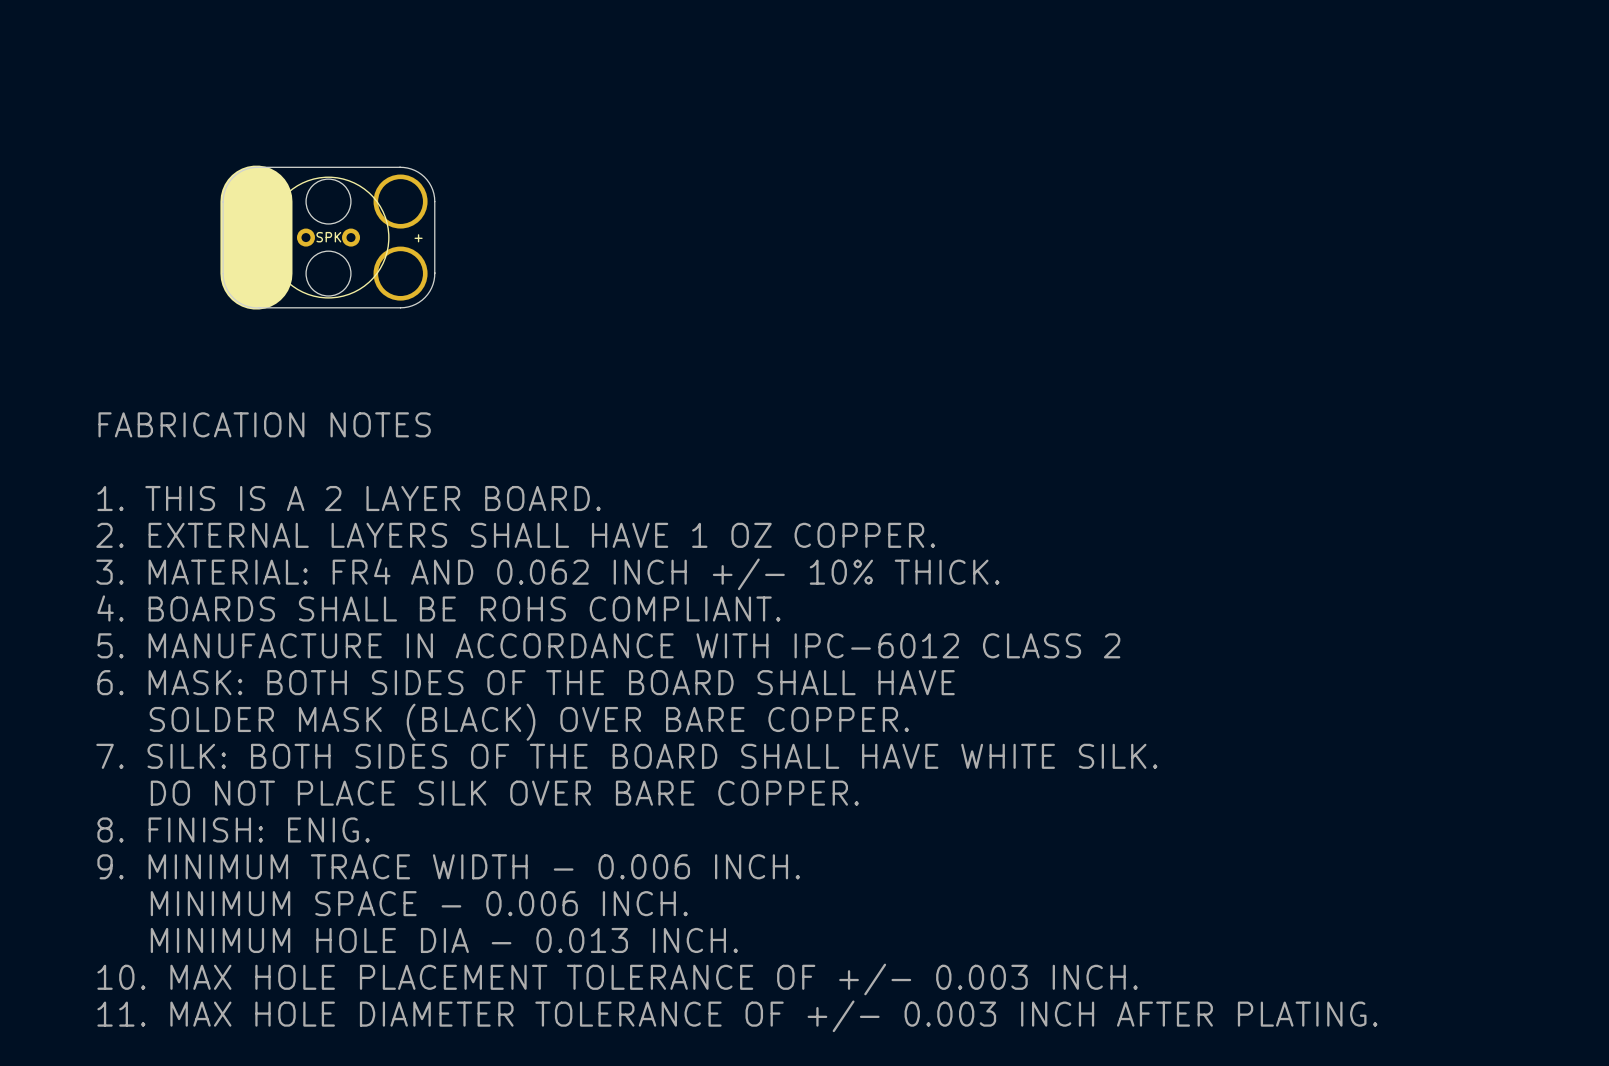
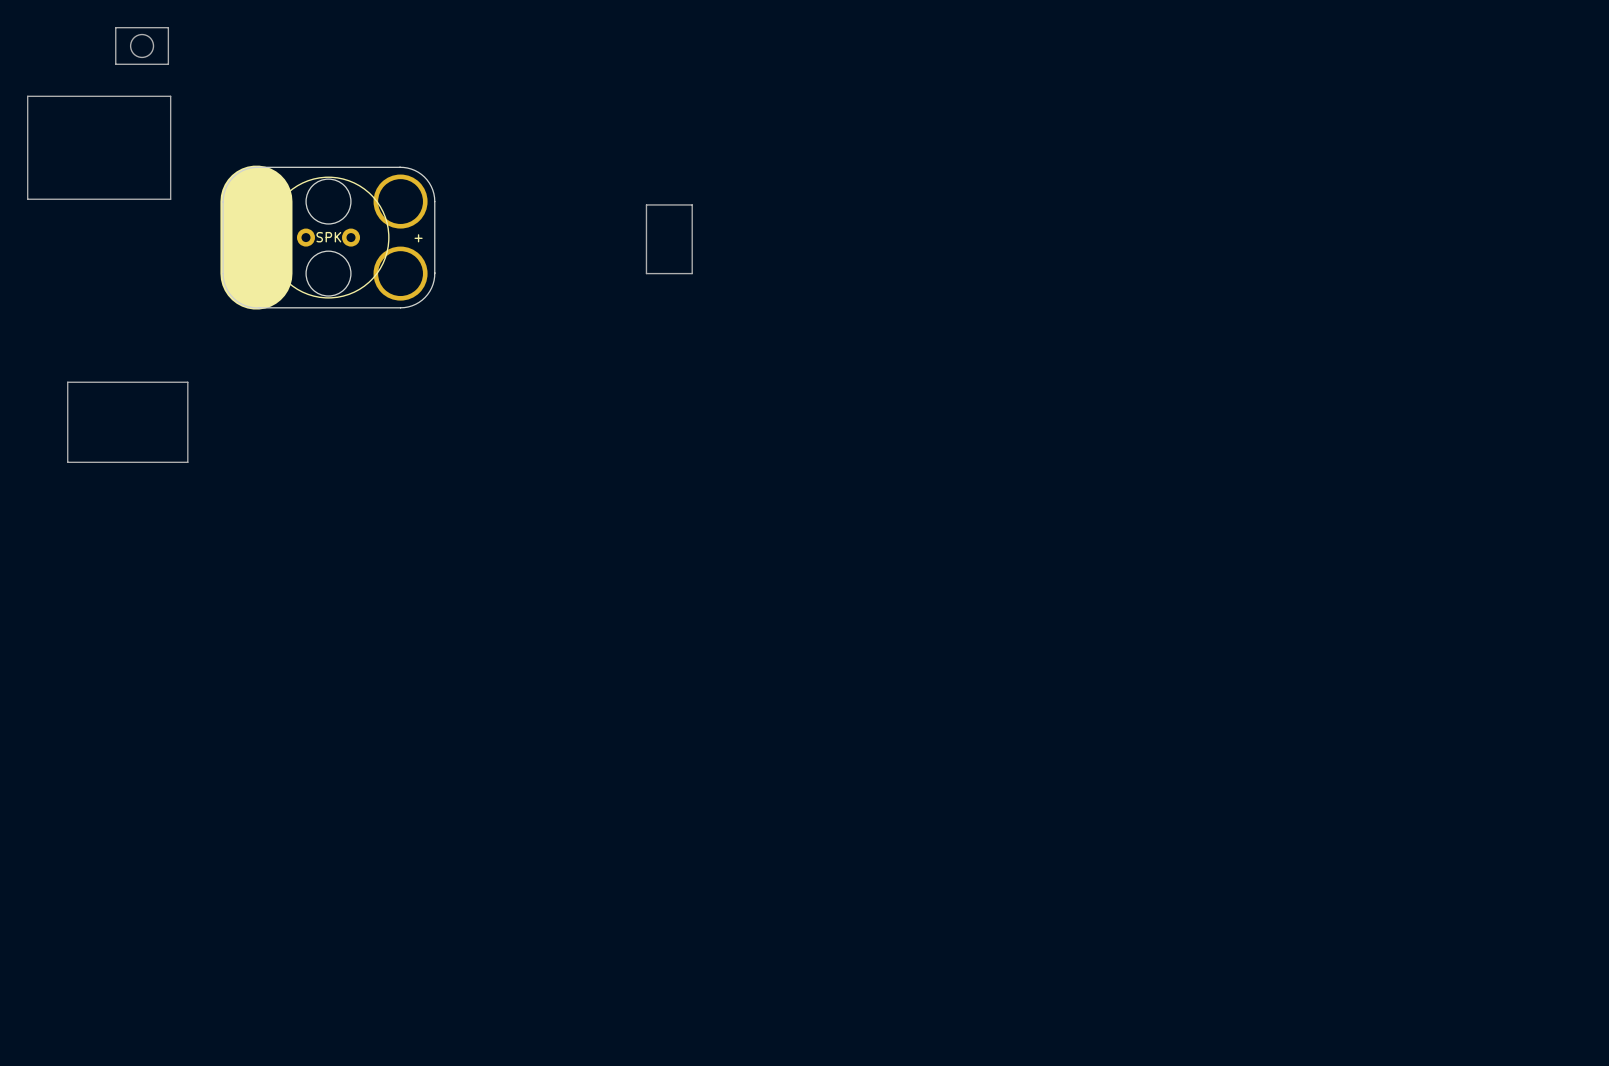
line: none -> (115, 27) (115, 64) (168, 64) (168, 27) (115, 27)
drawing: none -> [129, 33, 155, 59]
line: none -> (27, 96) (27, 199) (170, 199) (170, 96) (27, 96)
line: none -> (646, 204) (646, 273) (692, 273) (692, 204) (646, 204)
line: none -> (67, 382) (67, 462) (187, 462) (187, 382) (67, 382)
text: FABRICATION NOTES (264, 424) -> none
text: 1. THIS IS A 2 LAYER BOARD. (349, 498) -> none
text: 2. EXTERNAL LAYERS SHALL HAVE 1 OZ COPPER. (515, 535) -> none
text: 3. MATERIAL: FR4 AND 0.062 INCH +/- 10% THICK. (547, 574) -> none
text: 4. BOARDS SHALL BE ROHS COMPLIANT. (438, 608) -> none
text: 5. MANUFACTURE IN ACCORDANCE WITH IPC-6012 CLASS 2 (608, 645) -> none
text: 6. MASK: BOTH SIDES OF THE BOARD SHALL HAVE (526, 682) -> none
text: SOLDER MASK (BLACK) OVER BARE COPPER. (529, 722) -> none
text: 7. SILK: BOTH SIDES OF THE BOARD SHALL HAVE WHITE SILK. (626, 756) -> none
text: DO NOT PLACE SILK OVER BARE COPPER. (504, 793) -> none
text: 8. FINISH: ENIG. (233, 829) -> none
text: 9. MINIMUM TRACE WIDTH - 0.006 INCH. (448, 866) -> none
text: MINIMUM SPACE - 0.006 INCH. (419, 903) -> none
text: MINIMUM HOLE DIA - 0.013 INCH. (444, 940) -> none
text: 10. MAX HOLE PLACEMENT TOLERANCE OF +/- 0.003 INCH. (617, 979) -> none
text: 11. MAX HOLE DIAMETER TOLERANCE OF +/- 0.003 INCH AFTER PLATING. (737, 1016) -> none

